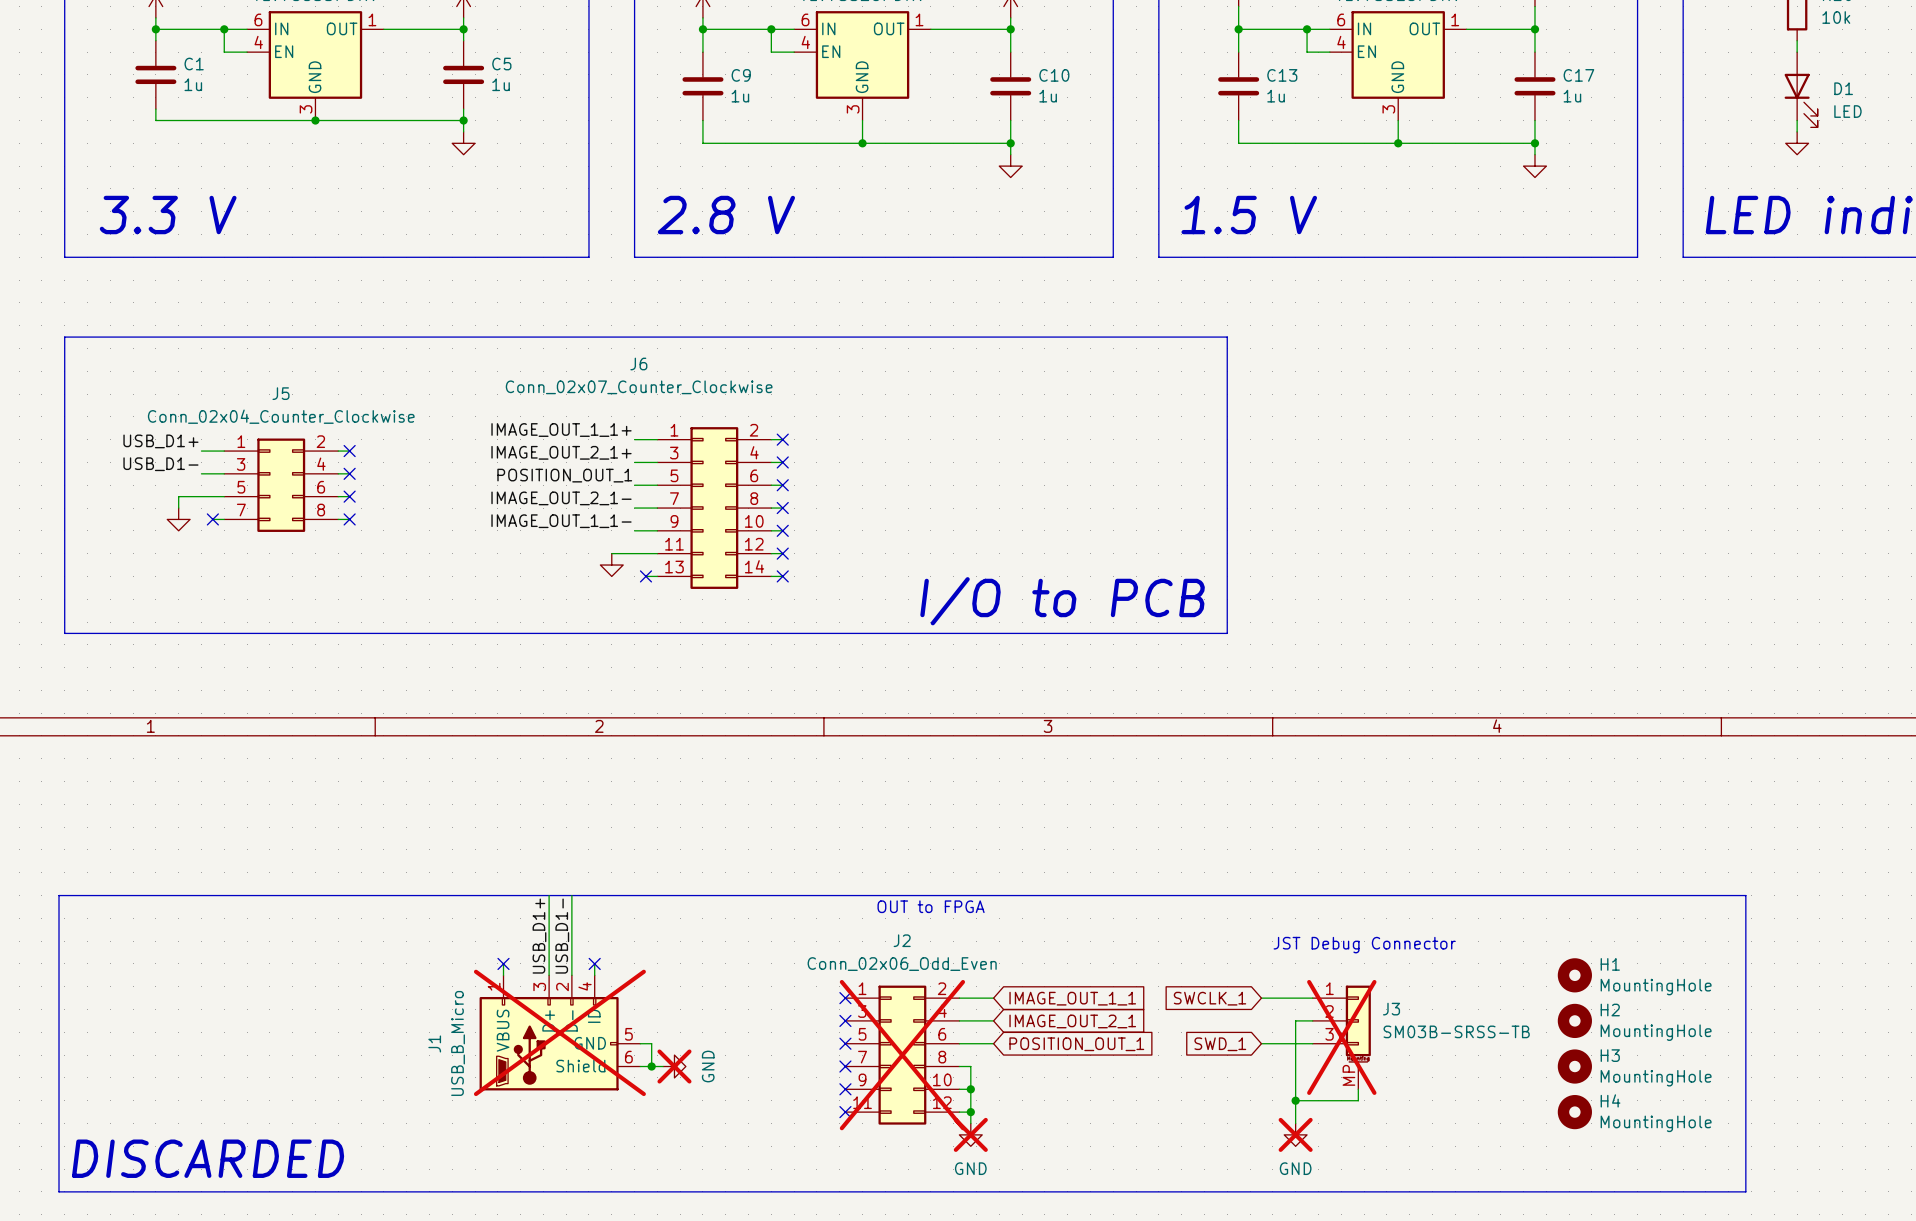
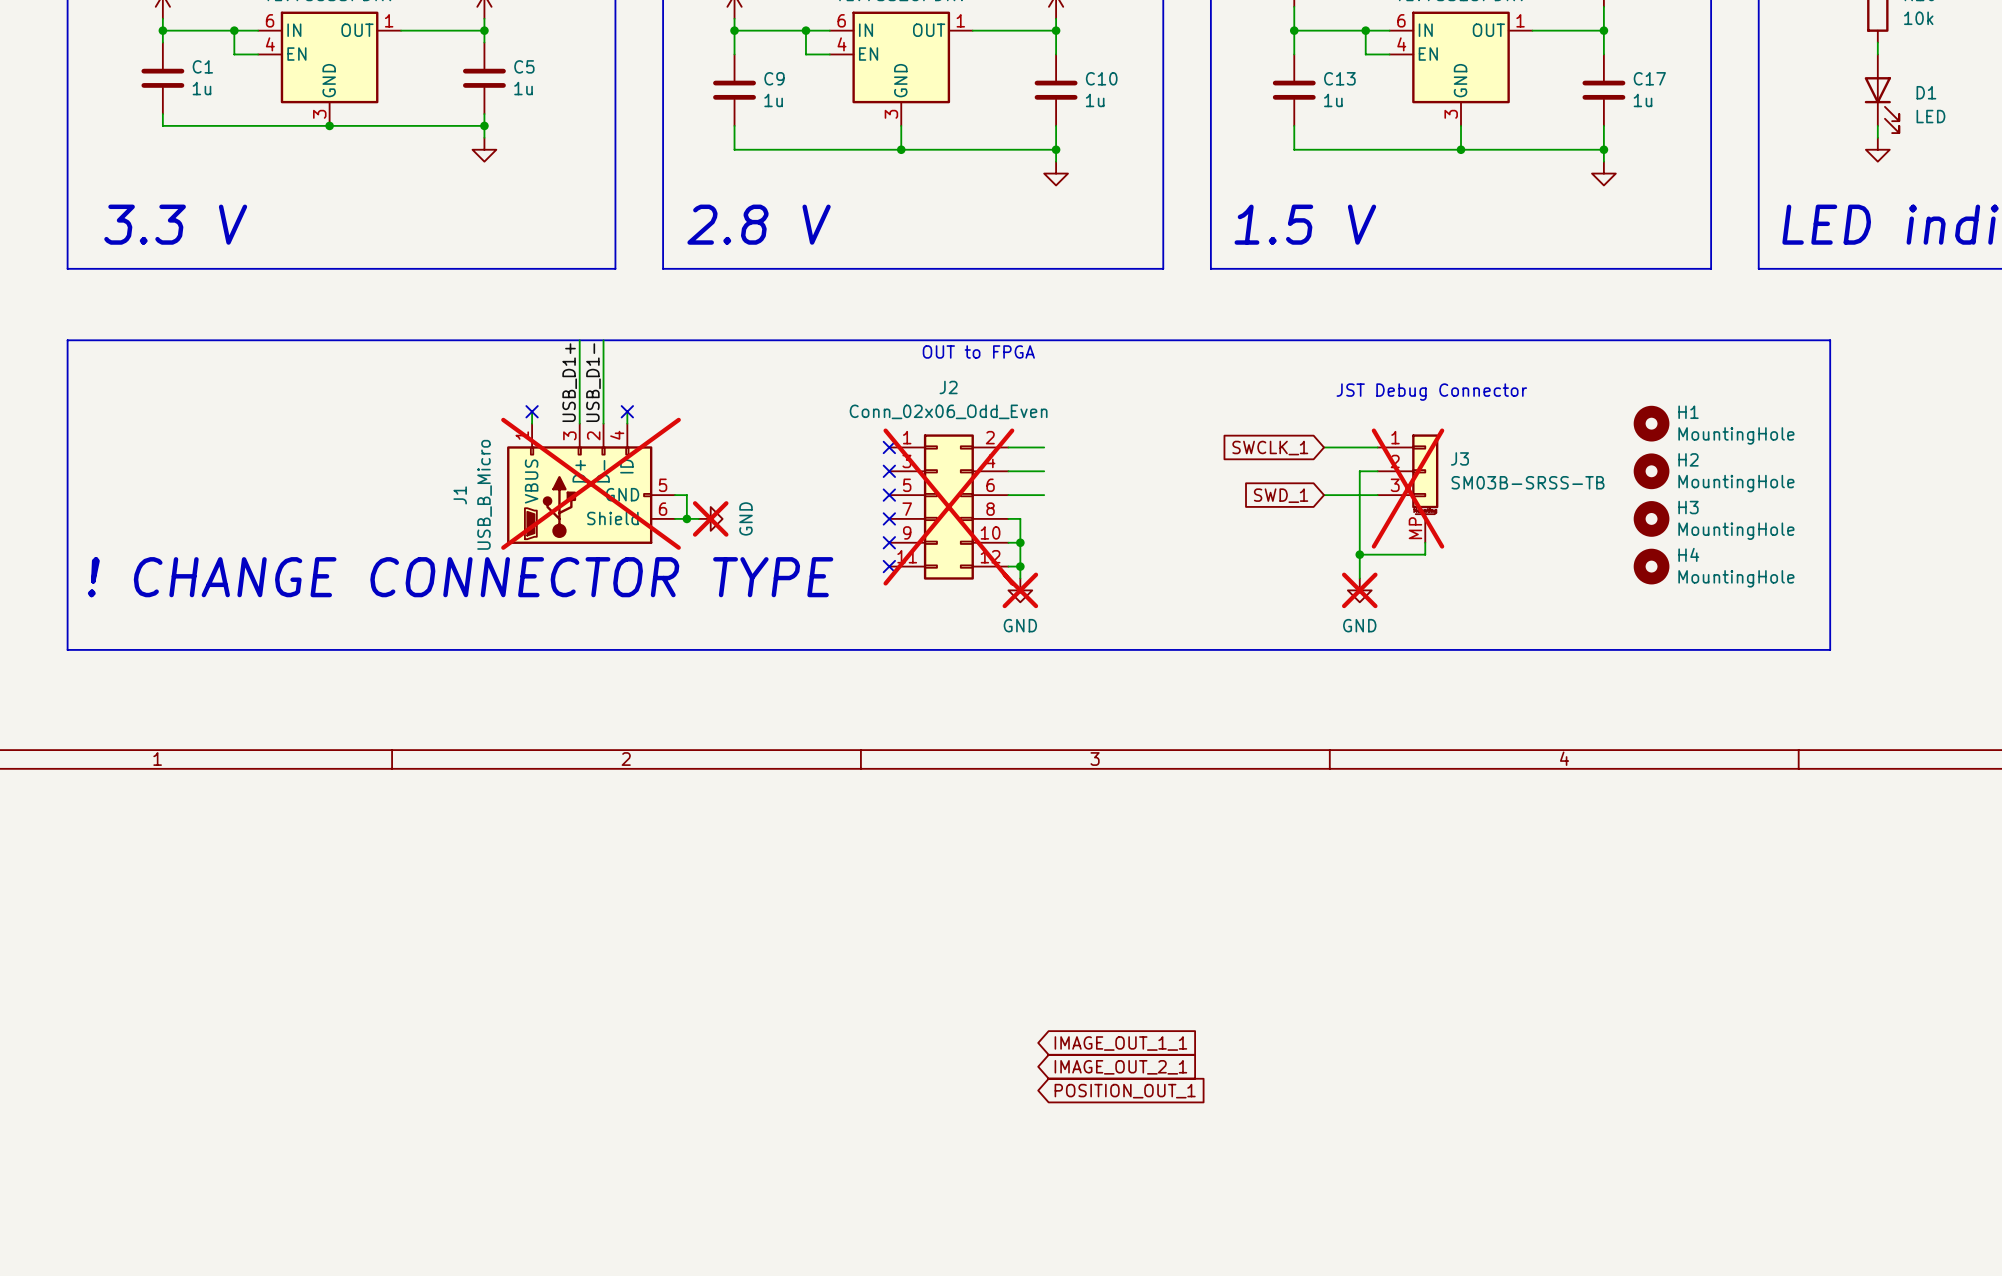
wire: none -> (579, 340) (579, 423)
wire: none -> (603, 340) (603, 423)
text: none -> OUT to FPGA (978, 351)
line: (64, 337) (1227, 337) (1227, 633) (64, 633) (64, 622) -> (67, 352) (67, 340) (1830, 340) (1830, 649) (67, 649)
label: none -> USB_D1+ (569, 382)
label: none -> USB_D1- (593, 382)
text: none -> JST Debug Connector (1431, 392)
wire: none -> (532, 411) (532, 423)
no-connect mark: none -> (532, 411)
wire: none -> (627, 411) (627, 423)
no-connect mark: none -> (627, 411)
no-connect mark: none -> (889, 447)
wire: none -> (1008, 447) (1044, 447)
global label: none -> SWCLK_1 (1270, 448)
wire: none -> (1324, 447) (1377, 447)
label: IMAGE_OUT_1_1+ (561, 430) -> none
wire: (634, 439) (657, 439) -> none
wire: (771, 439) (782, 439) -> none
no-connect mark: (782, 439) -> none
label: USB_D1+ (160, 441) -> none
wire: (201, 451) (224, 451) -> none
wire: (338, 451) (349, 451) -> none
no-connect mark: (349, 451) -> none
no-connect mark: none -> (889, 471)
wire: none -> (1008, 471) (1044, 471)
wire: none -> (1377, 471) (1359, 471) (1359, 578)
label: IMAGE_OUT_2_1+ (561, 452) -> none
wire: (634, 462) (657, 462) -> none
wire: (771, 462) (782, 462) -> none
no-connect mark: (782, 462) -> none
label: USB_D1- (160, 464) -> none
wire: (201, 473) (224, 473) -> none
wire: (338, 473) (349, 473) -> none
no-connect mark: (349, 473) -> none
wire: none -> (674, 495) (686, 495) (686, 518)
no-connect mark: none -> (889, 495)
wire: none -> (1008, 495) (1044, 495)
wire: none -> (1324, 495) (1377, 495)
global label: none -> SWD_1 (1281, 495)
label: POSITION_OUT_1 (564, 475) -> none
J5: Conn_02x04_Counter_Clockwise (281, 485) -> none
wire: (634, 485) (657, 485) -> none
wire: (771, 485) (782, 485) -> none
no-connect mark: (782, 485) -> none
wire: (224, 496) (178, 496) (178, 508) -> none
wire: (338, 496) (349, 496) -> none
no-connect mark: (349, 496) -> none
junction: none -> (686, 518)
power symbol: none -> GND (710, 518)
no-connect mark: none -> (889, 518)
wire: none -> (1008, 518) (1020, 518) (1020, 578)
label: IMAGE_OUT_2_1- (561, 498) -> none
wire: (634, 508) (657, 508) -> (674, 518) (698, 518)
J6: Conn_02x07_Counter_Clockwise (714, 508) -> none
wire: (771, 508) (782, 508) -> (1008, 542) (1020, 542)
no-connect mark: (782, 508) -> none
power symbol: (178, 519) -> none
wire: (212, 519) (224, 519) -> none
no-connect mark: (212, 519) -> none
wire: (338, 519) (349, 519) -> none
no-connect mark: (349, 519) -> none
no-connect mark: none -> (889, 542)
junction: none -> (1020, 542)
wire: none -> (1425, 542) (1425, 554) (1359, 554)
label: IMAGE_OUT_1_1- (561, 521) -> none
wire: (634, 530) (657, 530) -> none
wire: (771, 530) (782, 530) -> (1008, 566) (1020, 566)
no-connect mark: (782, 530) -> none
junction: none -> (1359, 554)
no-connect mark: none -> (889, 566)
junction: none -> (1020, 566)
text: none -> ! CHANGE CONNECTOR TYPE (460, 577)
wire: (611, 553) (657, 553) -> none
no-connect mark: (782, 553) -> none
power symbol: (611, 565) -> none
power symbol: none -> GND (1020, 590)
power symbol: none -> GND (1359, 590)
wire: (645, 576) (657, 576) -> none
no-connect mark: (645, 576) -> none
wire: (771, 576) (782, 576) -> none
no-connect mark: (782, 576) -> none
text: I/O to PCB (1062, 601) -> none
line: (59, 895) (1745, 895) (1745, 1191) (59, 1191) (59, 895) -> none
wire: (549, 895) (549, 975) -> none
wire: (571, 895) (571, 975) -> none
text: OUT to FPGA (931, 906) -> none
label: USB_D1+ (539, 936) -> none
label: USB_D1- (562, 936) -> none
text: JST Debug Connector (1364, 945) -> none
wire: (503, 963) (503, 975) -> none
no-connect mark: (503, 963) -> none
wire: (594, 963) (594, 975) -> none
no-connect mark: (594, 963) -> none
H1 position: (1574, 975) -> (1651, 423)
no-connect mark: (845, 998) -> none
wire: (959, 998) (993, 998) -> none
global label: SWCLK_1 (1210, 998) -> none
wire: (1261, 998) (1312, 998) -> none
no-connect mark: (845, 1020) -> none
wire: (959, 1020) (993, 1020) -> none
wire: (1312, 1020) (1295, 1020) (1295, 1123) -> none
H2 position: (1574, 1020) -> (1651, 471)
J1 position: (559, 1032) -> (591, 483)
J3 position: (1341, 1037) -> (1408, 488)
wire: (640, 1043) (651, 1043) (651, 1066) -> none
no-connect mark: (845, 1043) -> none
wire: (959, 1043) (993, 1043) -> none
wire: (1261, 1043) (1312, 1043) -> none
global label: SWD_1 (1220, 1044) -> none
J2 position: (902, 1055) -> (948, 507)
wire: (640, 1066) (663, 1066) -> none
junction: (651, 1066) -> none
power symbol: GND (674, 1066) -> none
no-connect mark: (845, 1066) -> none
wire: (959, 1066) (970, 1066) (970, 1123) -> none
H3 position: (1574, 1066) -> (1651, 518)
no-connect mark: (845, 1089) -> none
wire: (959, 1089) (970, 1089) -> none
junction: (970, 1089) -> none
wire: (1358, 1089) (1358, 1100) (1295, 1100) -> none
junction: (1295, 1100) -> none
no-connect mark: (845, 1112) -> none
wire: (959, 1112) (970, 1112) -> none
junction: (970, 1112) -> none
H4 position: (1574, 1112) -> (1651, 566)
power symbol: GND (970, 1134) -> none
power symbol: GND (1295, 1134) -> none
text: DISCARDED (208, 1158) -> none

